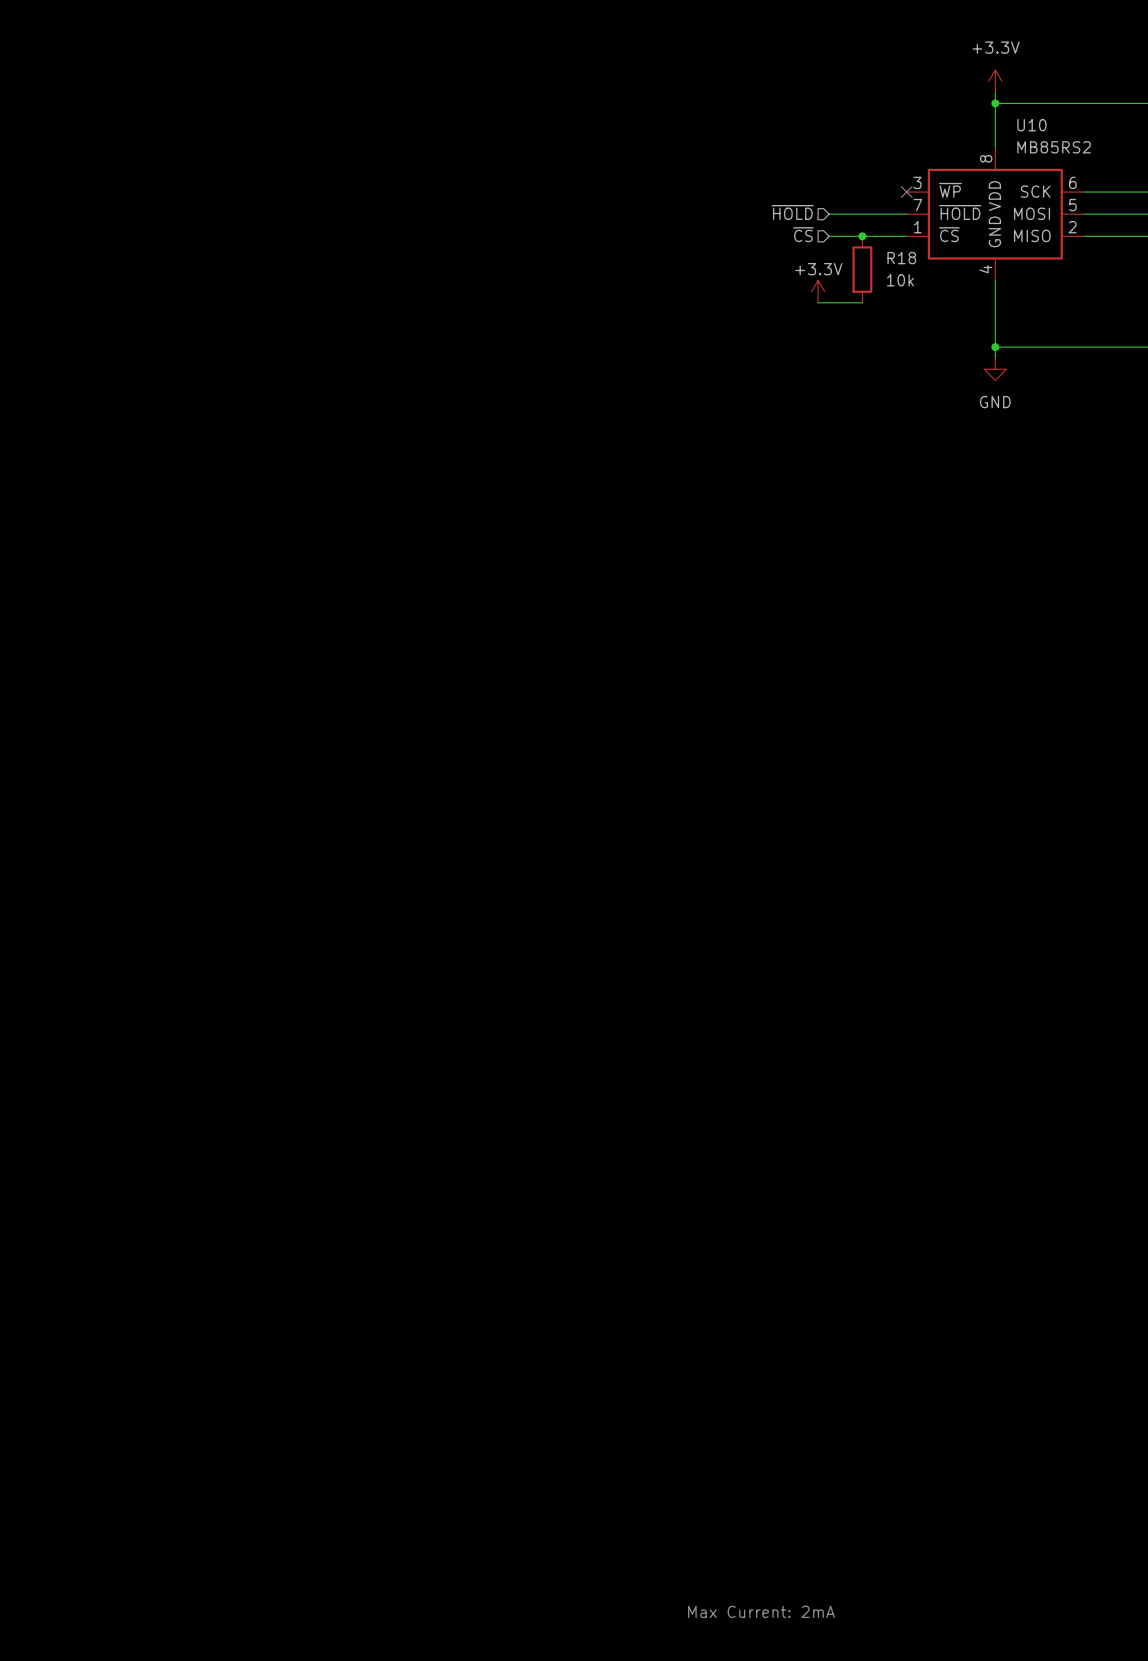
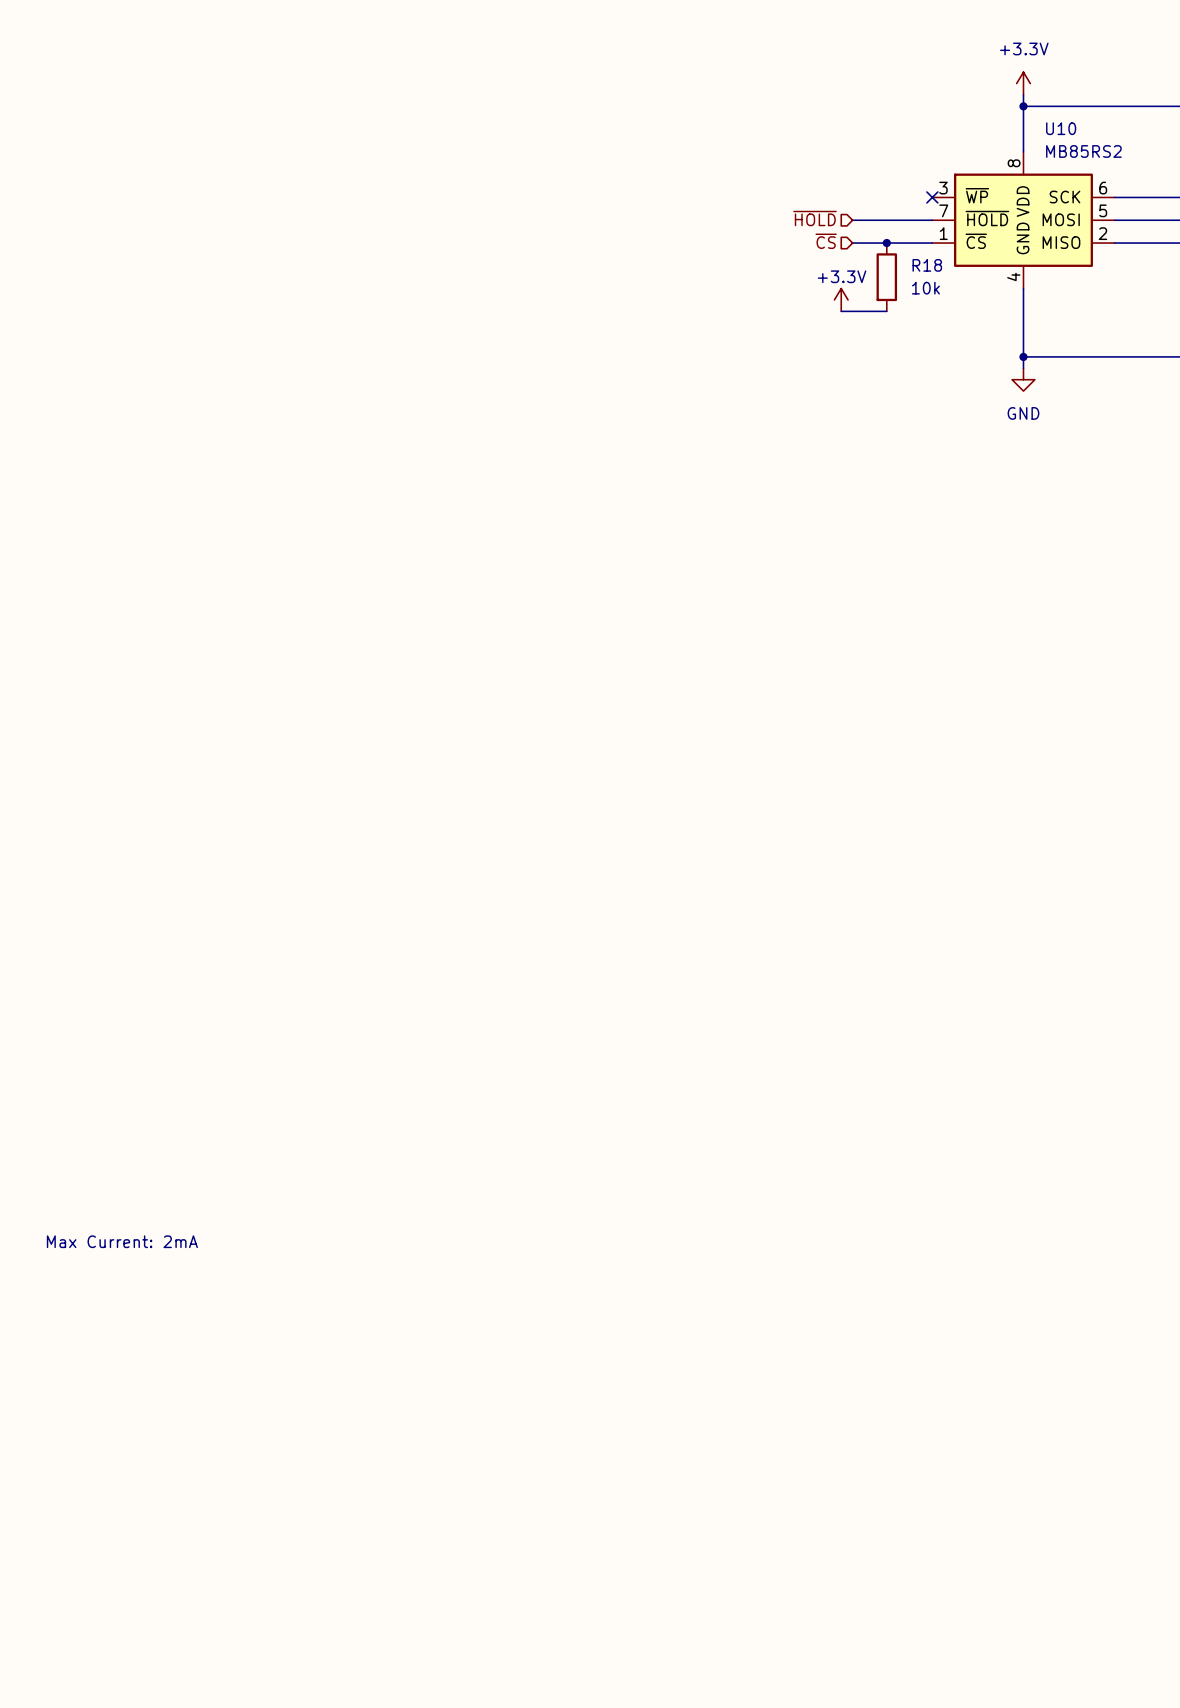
text: none -> Max Current: 2mA (122, 1241)
text: Max Current: 2mA (761, 1611) -> none

